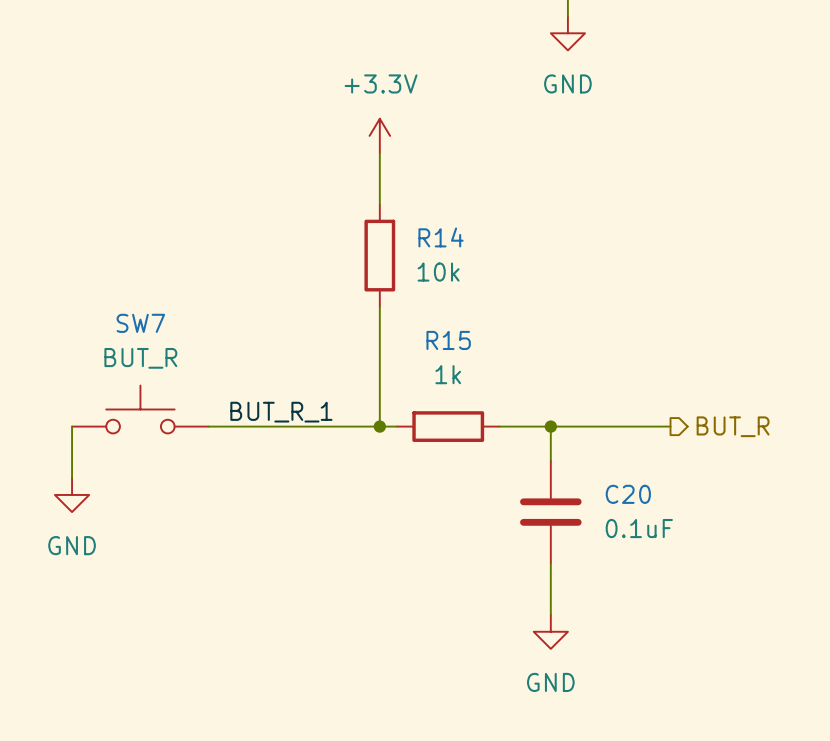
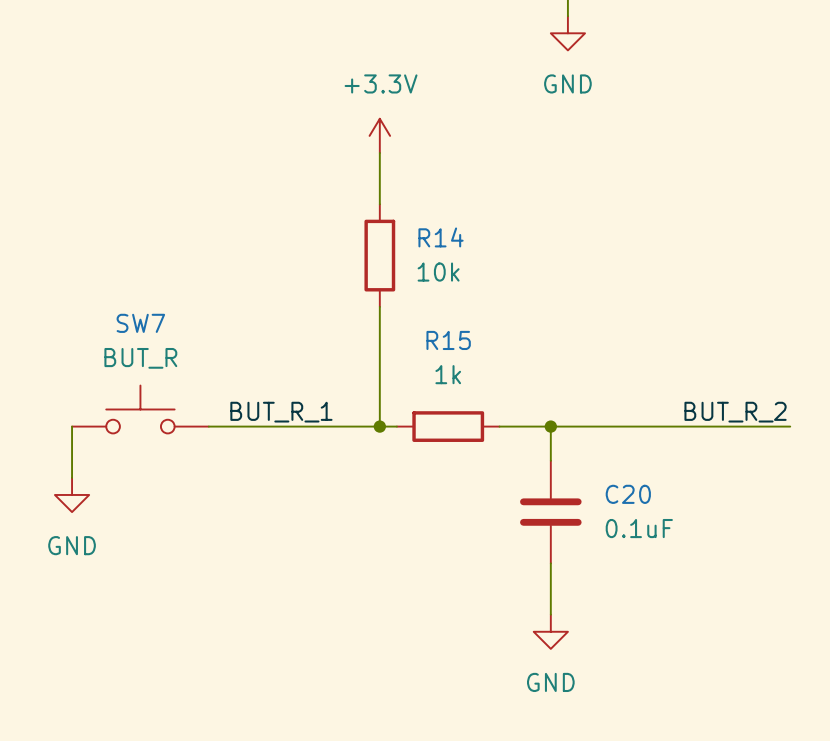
label: none -> BUT_R_2 (735, 412)
wire: none -> (670, 426) (790, 426)
hierarchical label: BUT_R (733, 426) -> none

